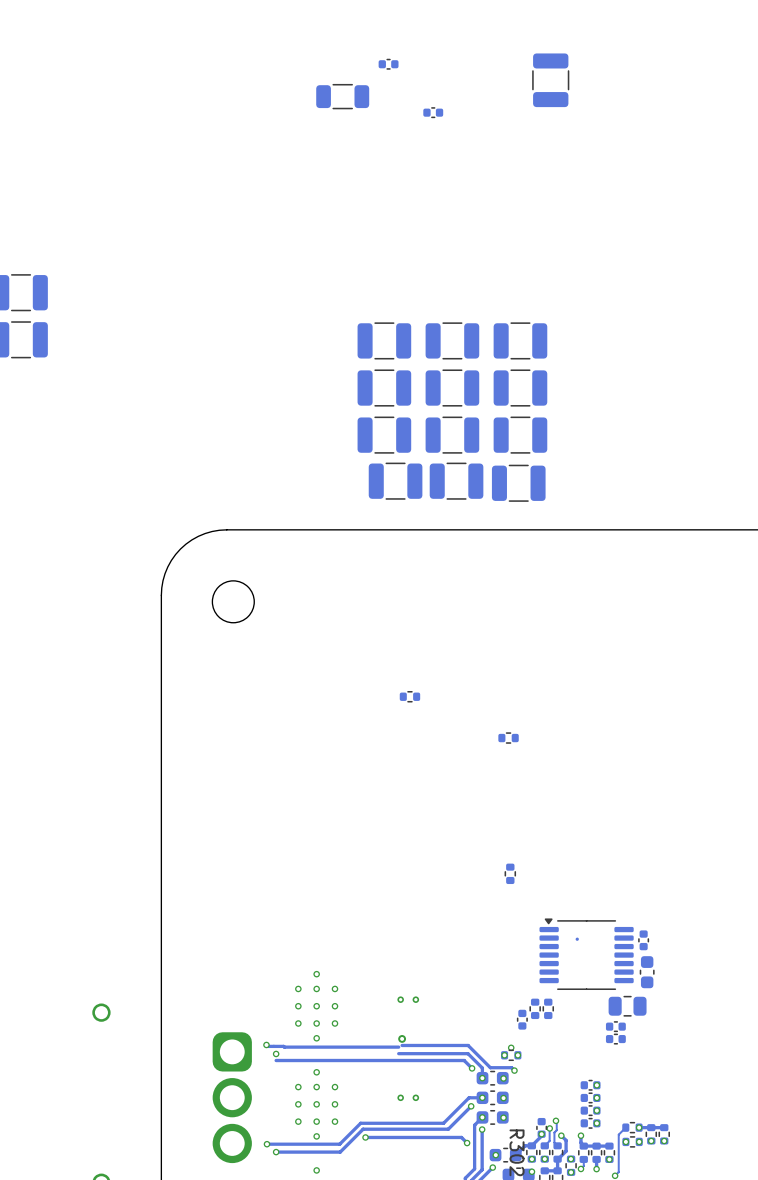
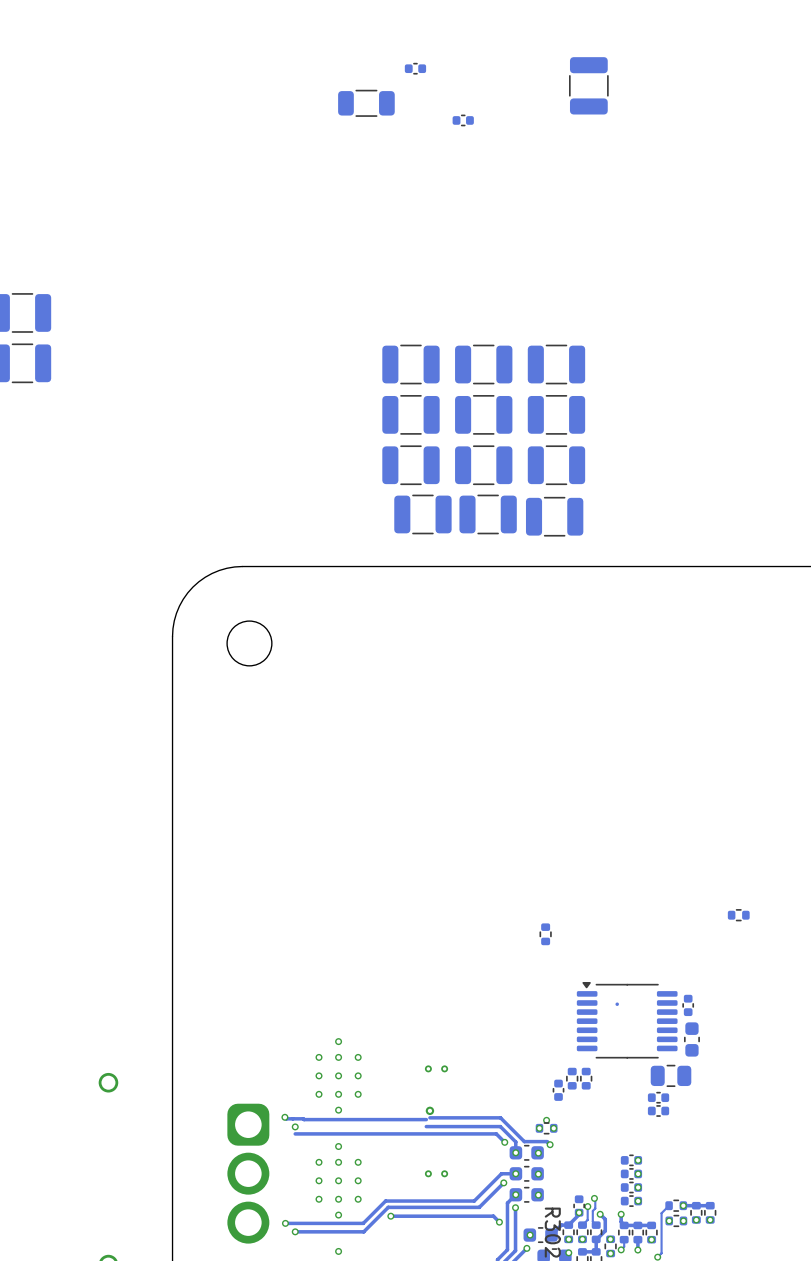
part: (409, 696) -> none
part: (508, 738) -> none
part: none -> (738, 915)

